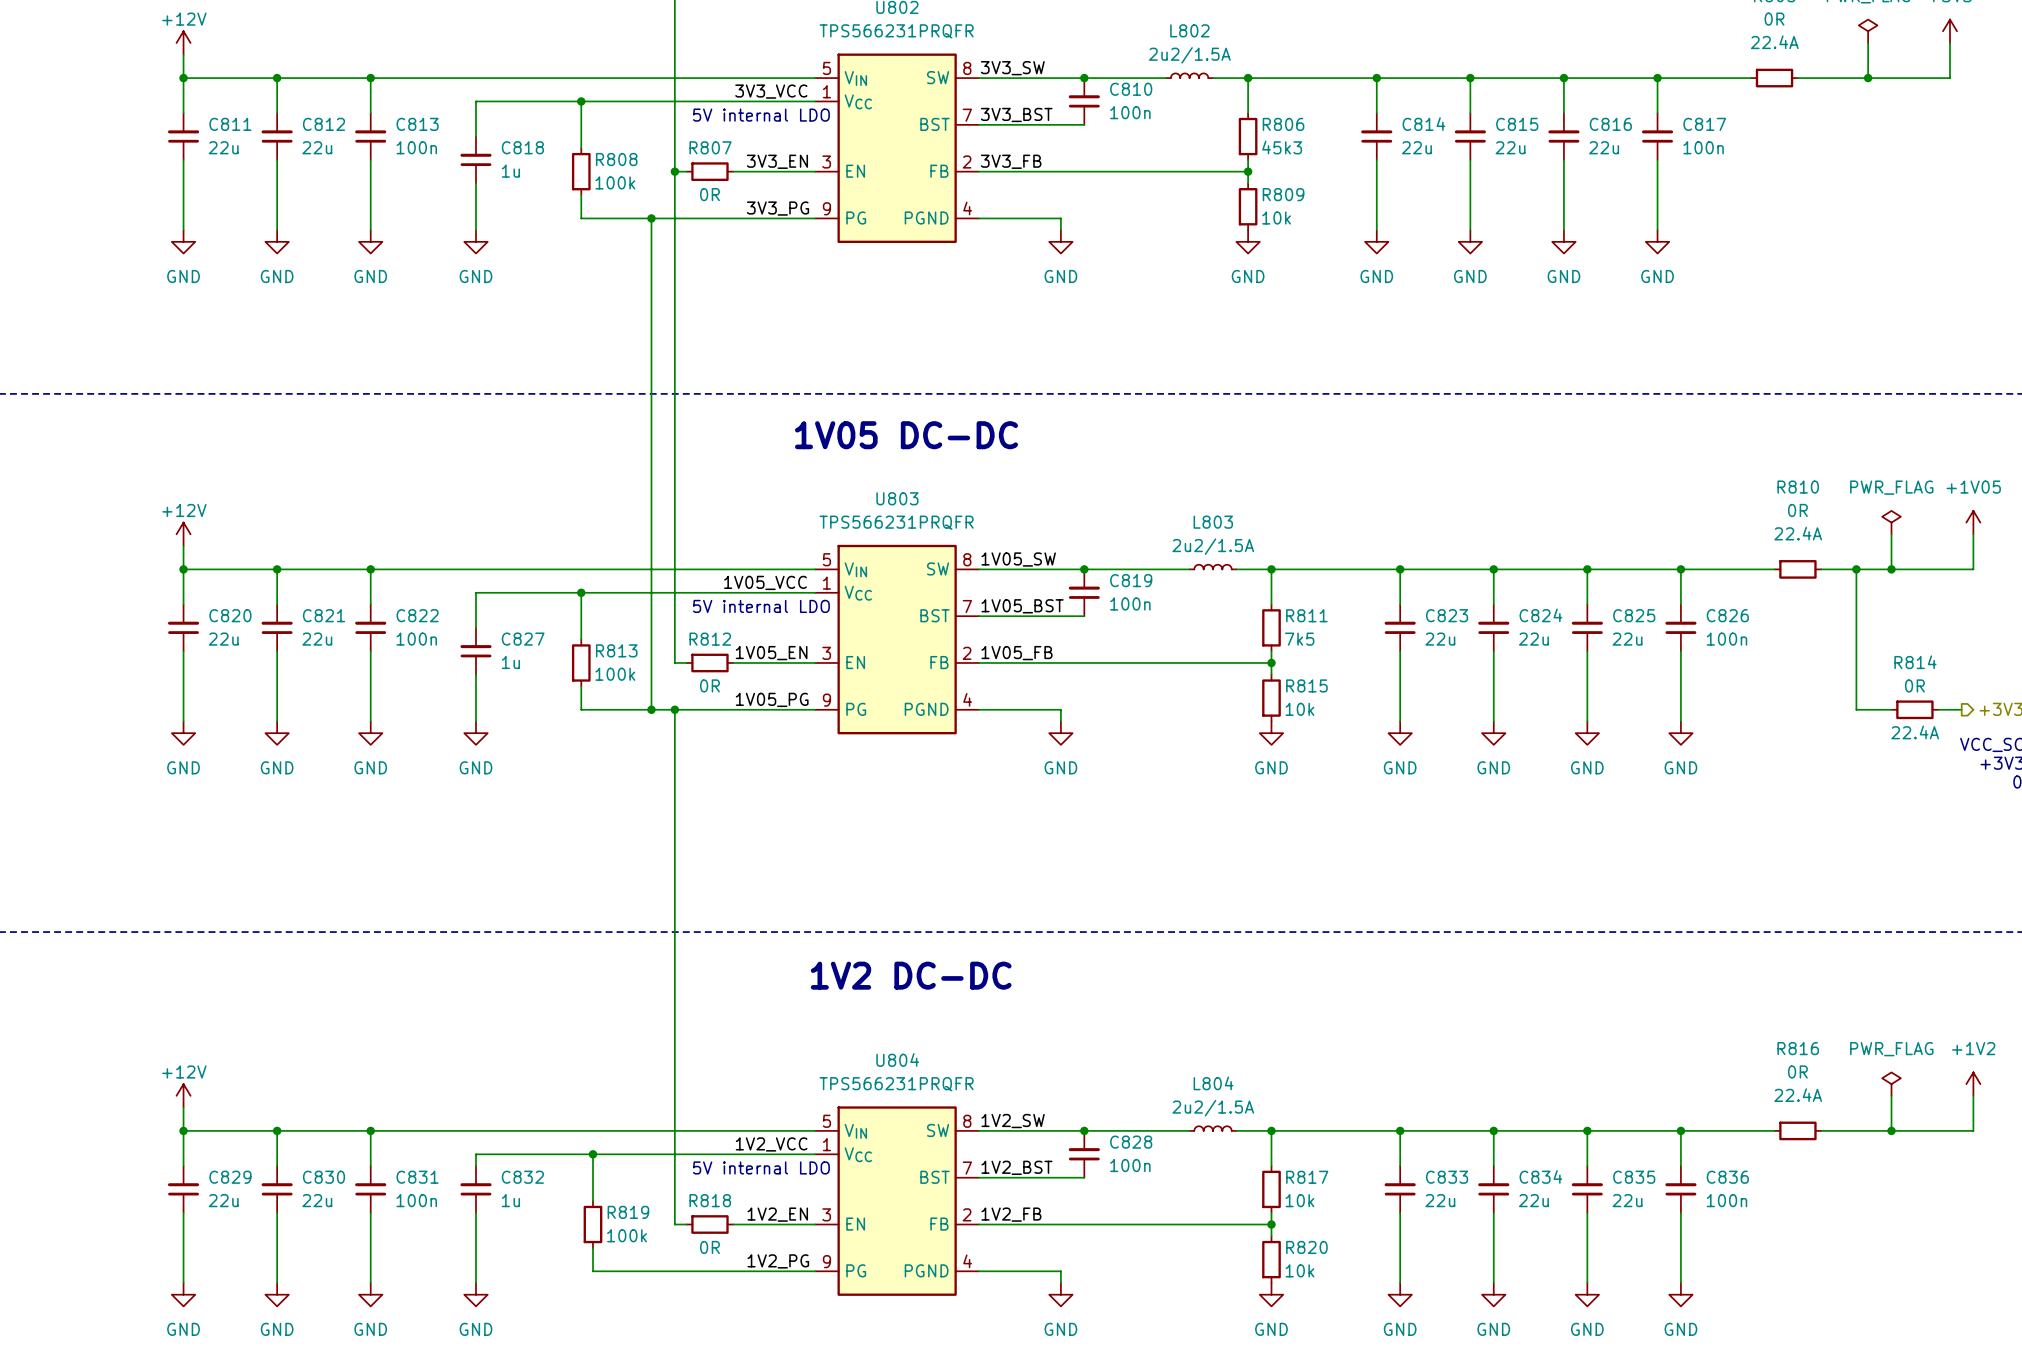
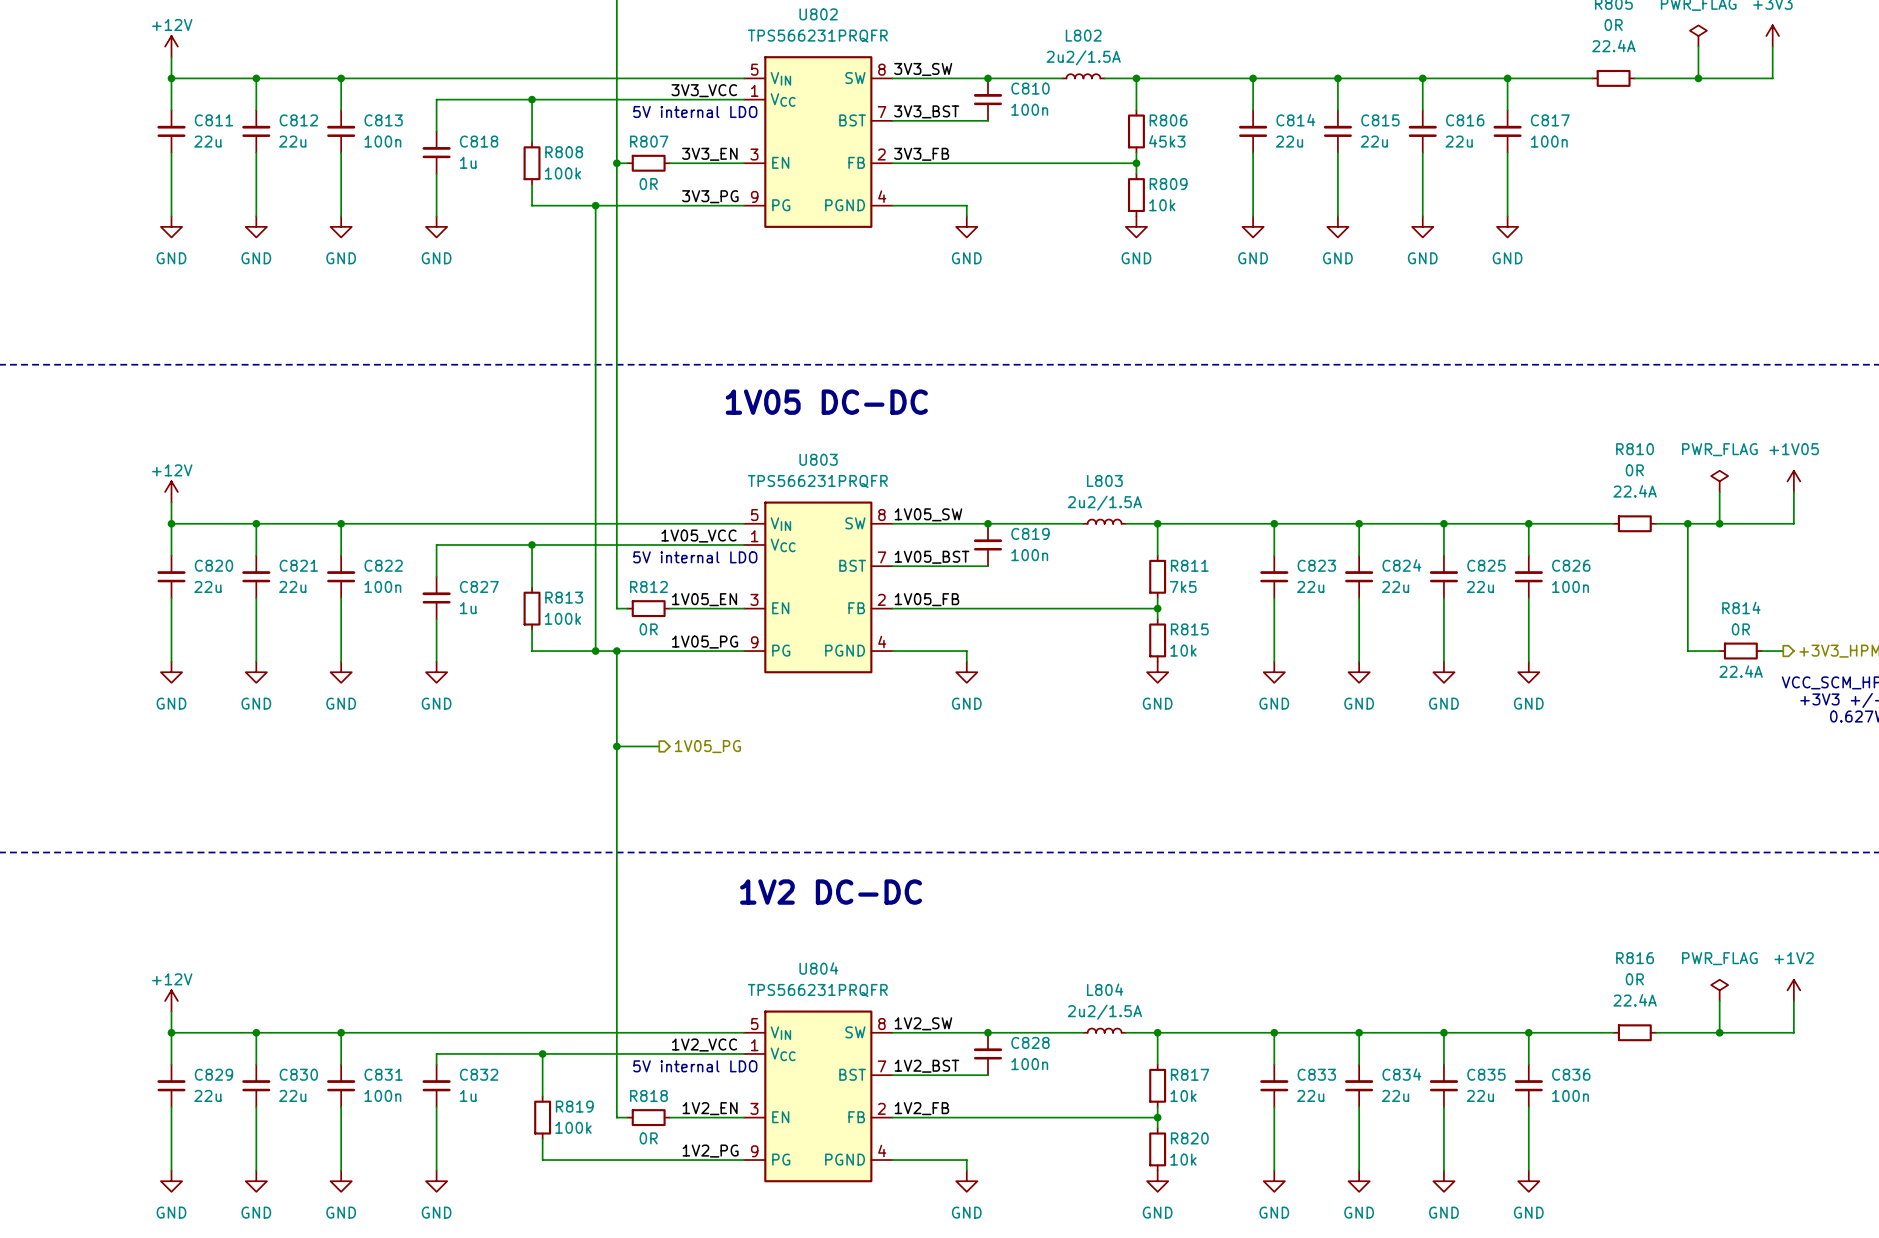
wire: none -> (616, 746) (659, 746)
junction: none -> (616, 746)
hierarchical label: none -> 1V05_PG (707, 746)

